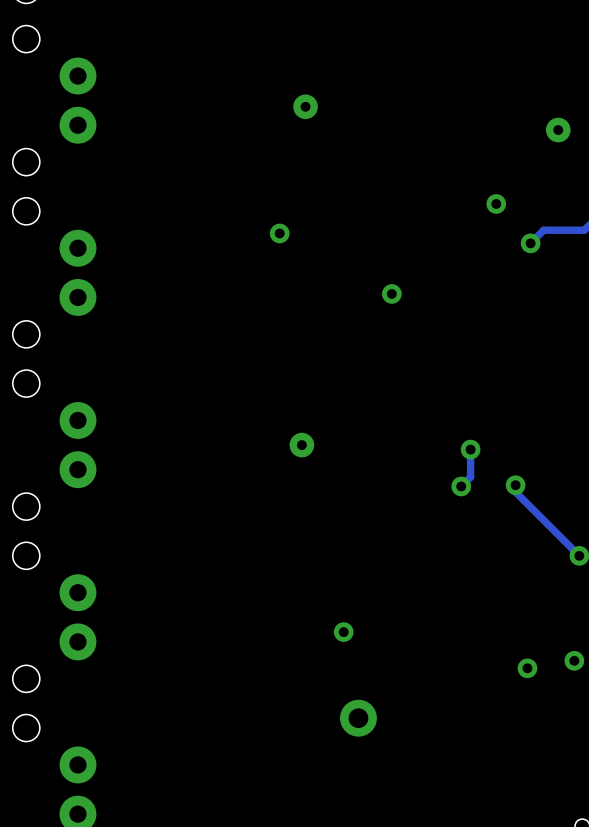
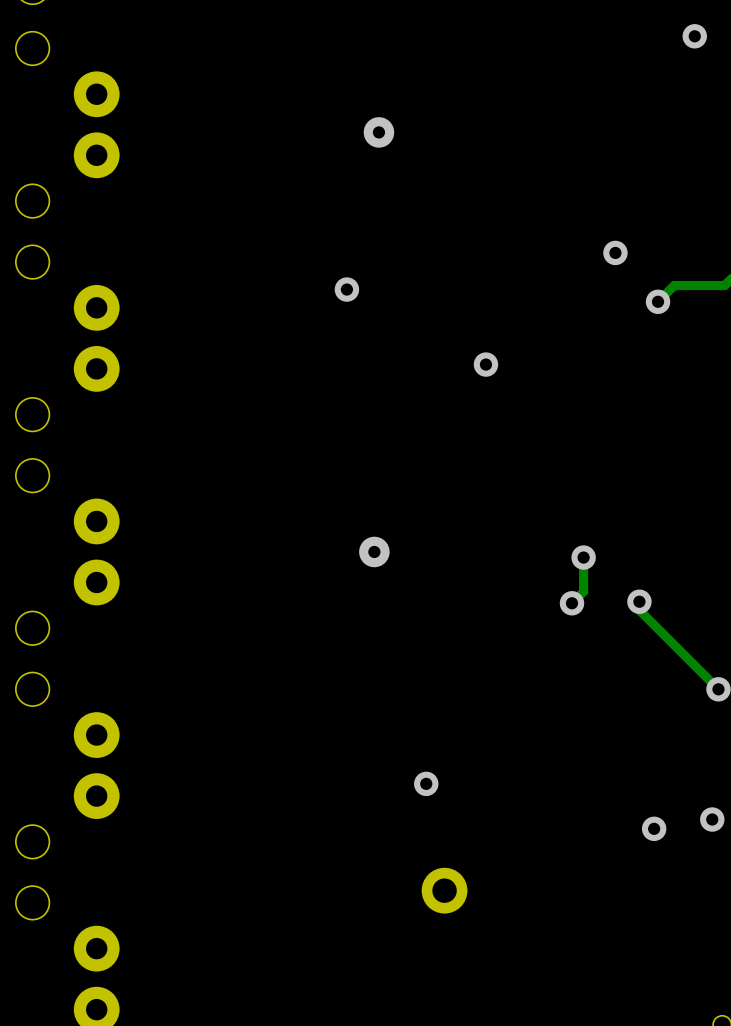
via: none -> (694, 36)
via: (558, 130) -> none

